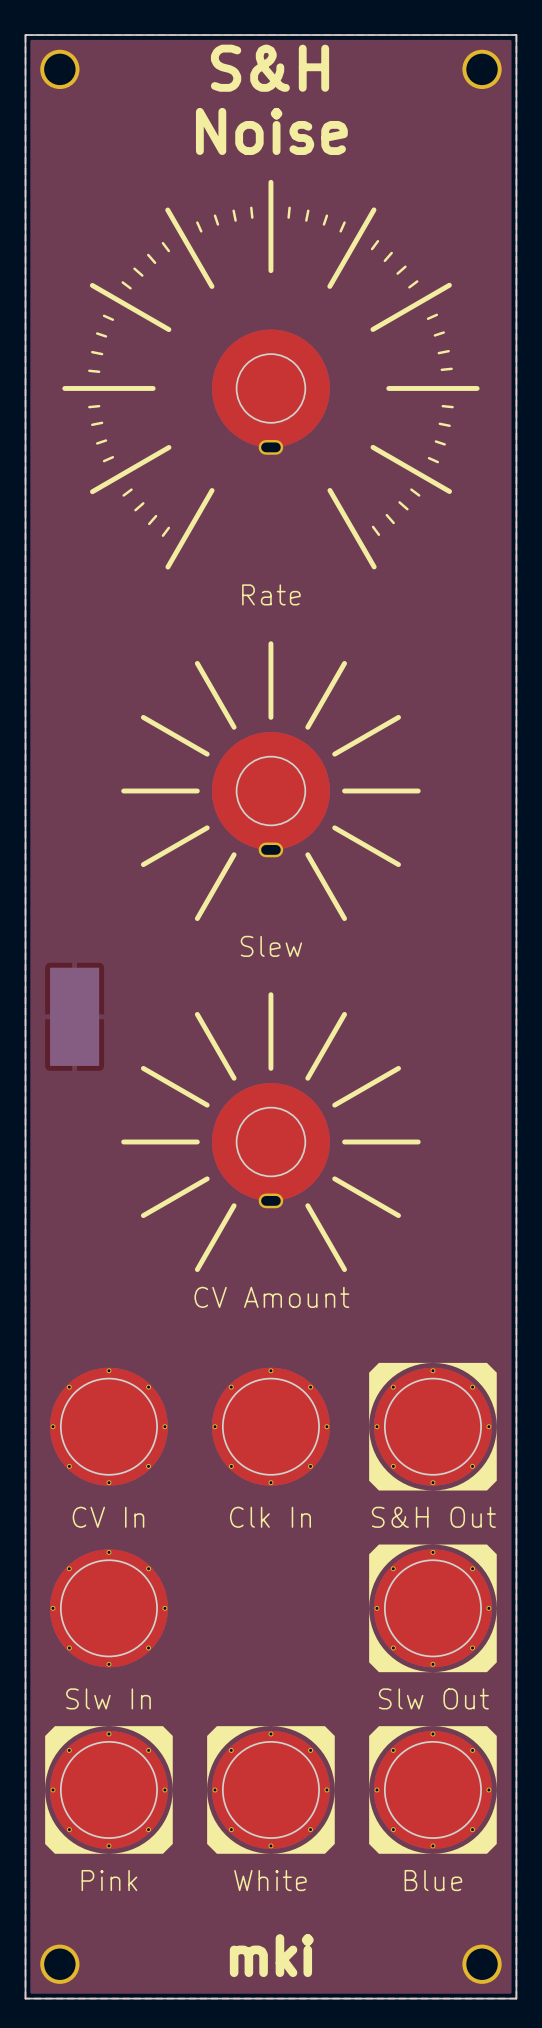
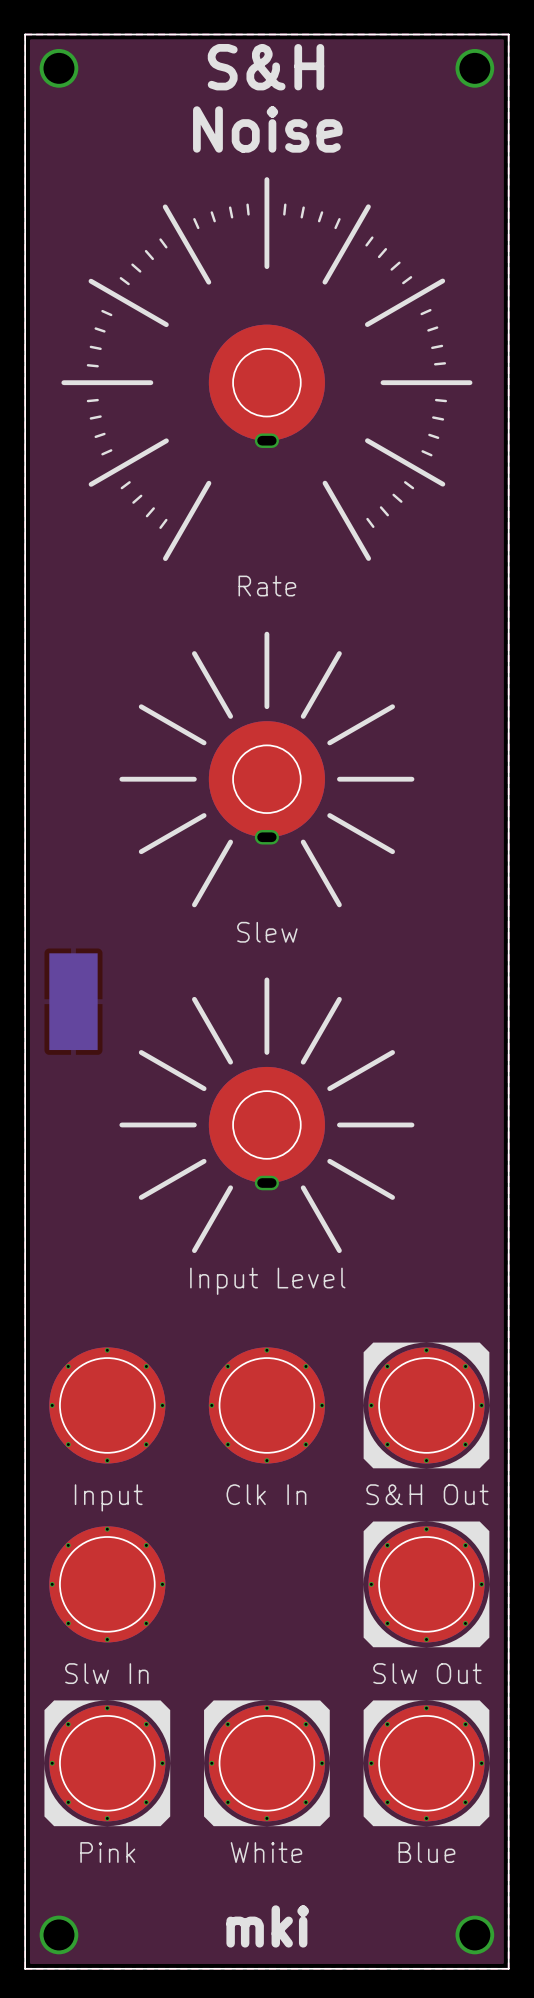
part value: CV Amount (271, 1297) -> Input Level (267, 1281)
part value: CV In (108, 1517) -> Input (108, 1497)

